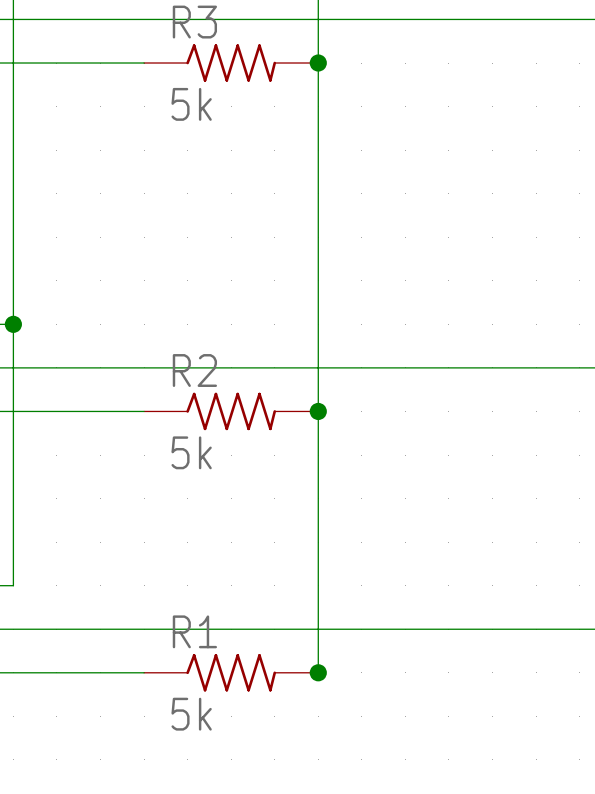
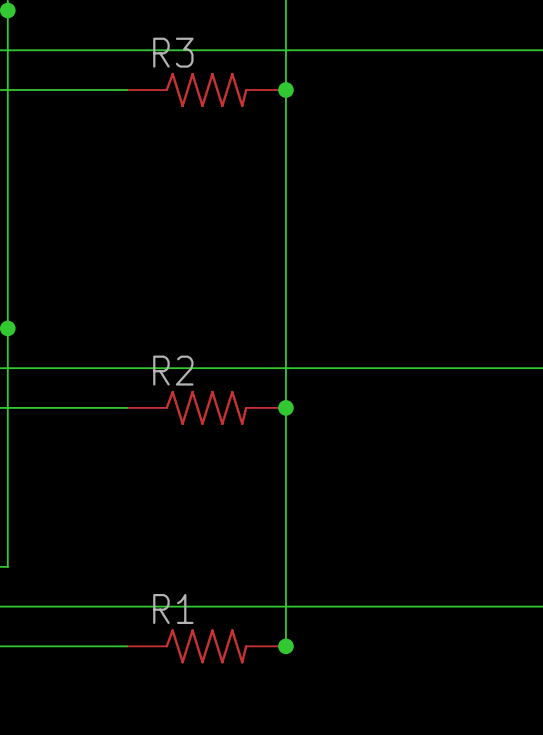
R3 value: 5k (191, 104) -> none
R2 value: 5k (191, 452) -> none
R1 value: 5k (191, 714) -> none

